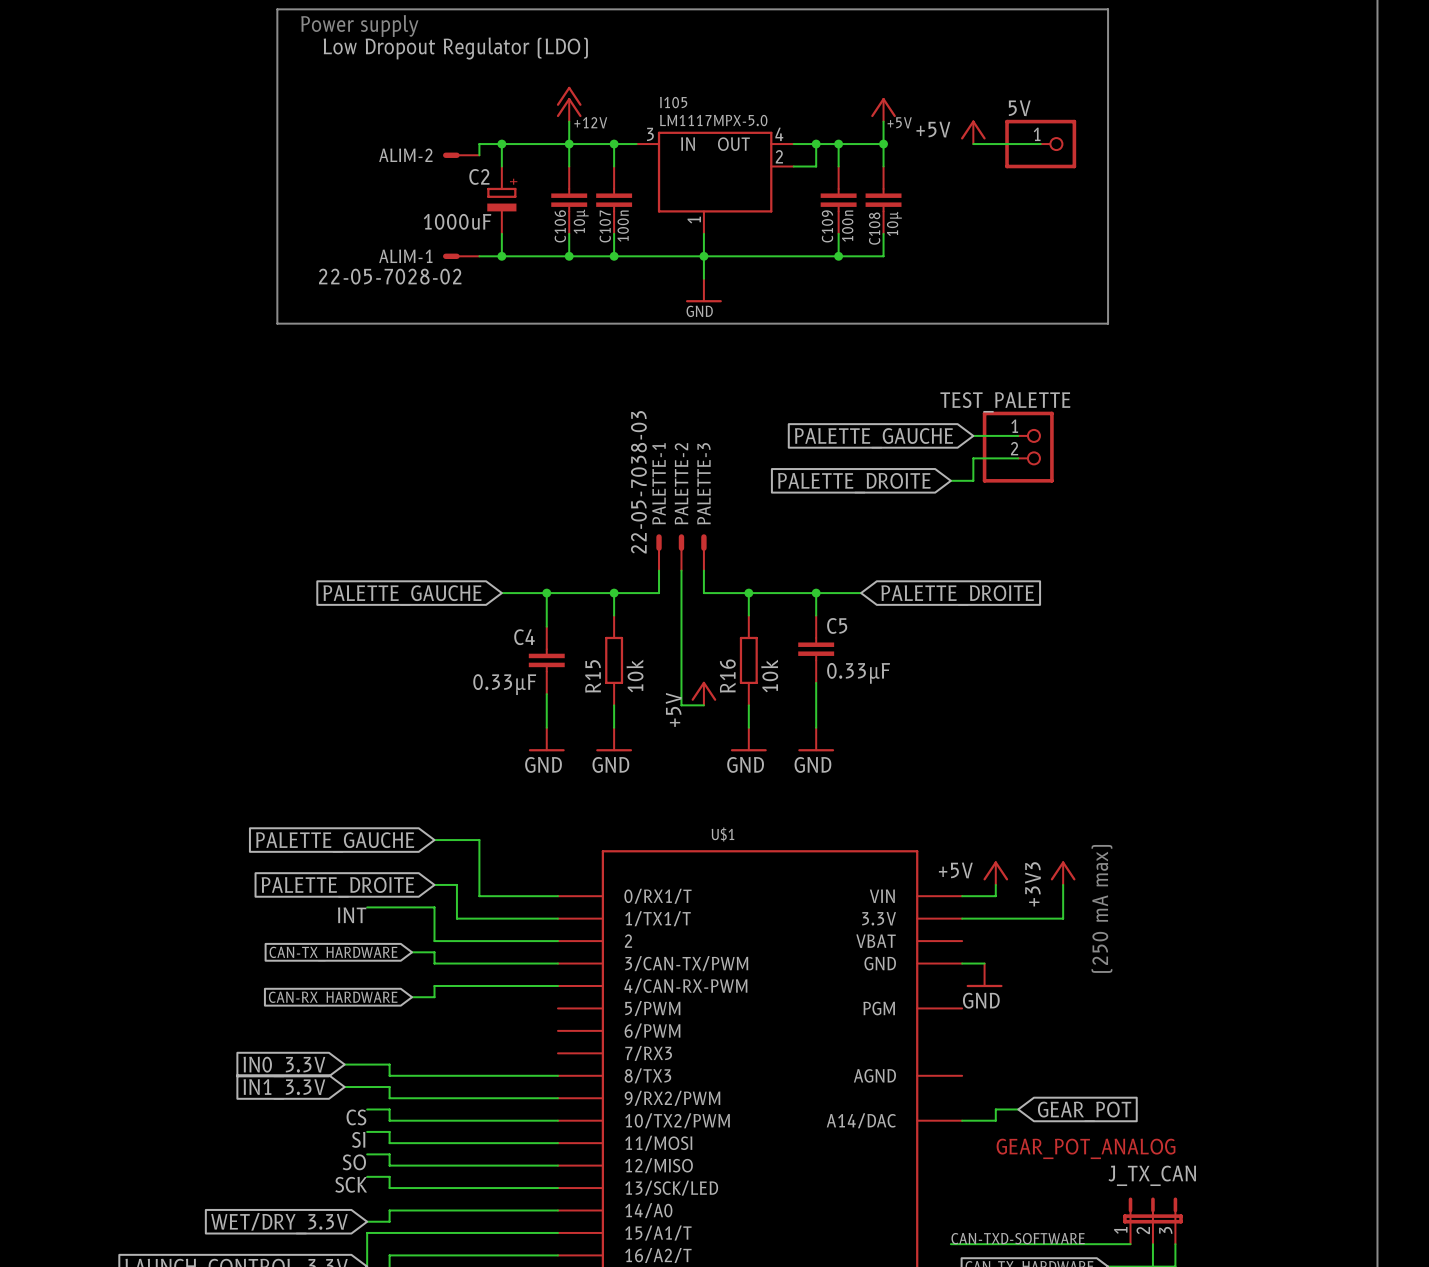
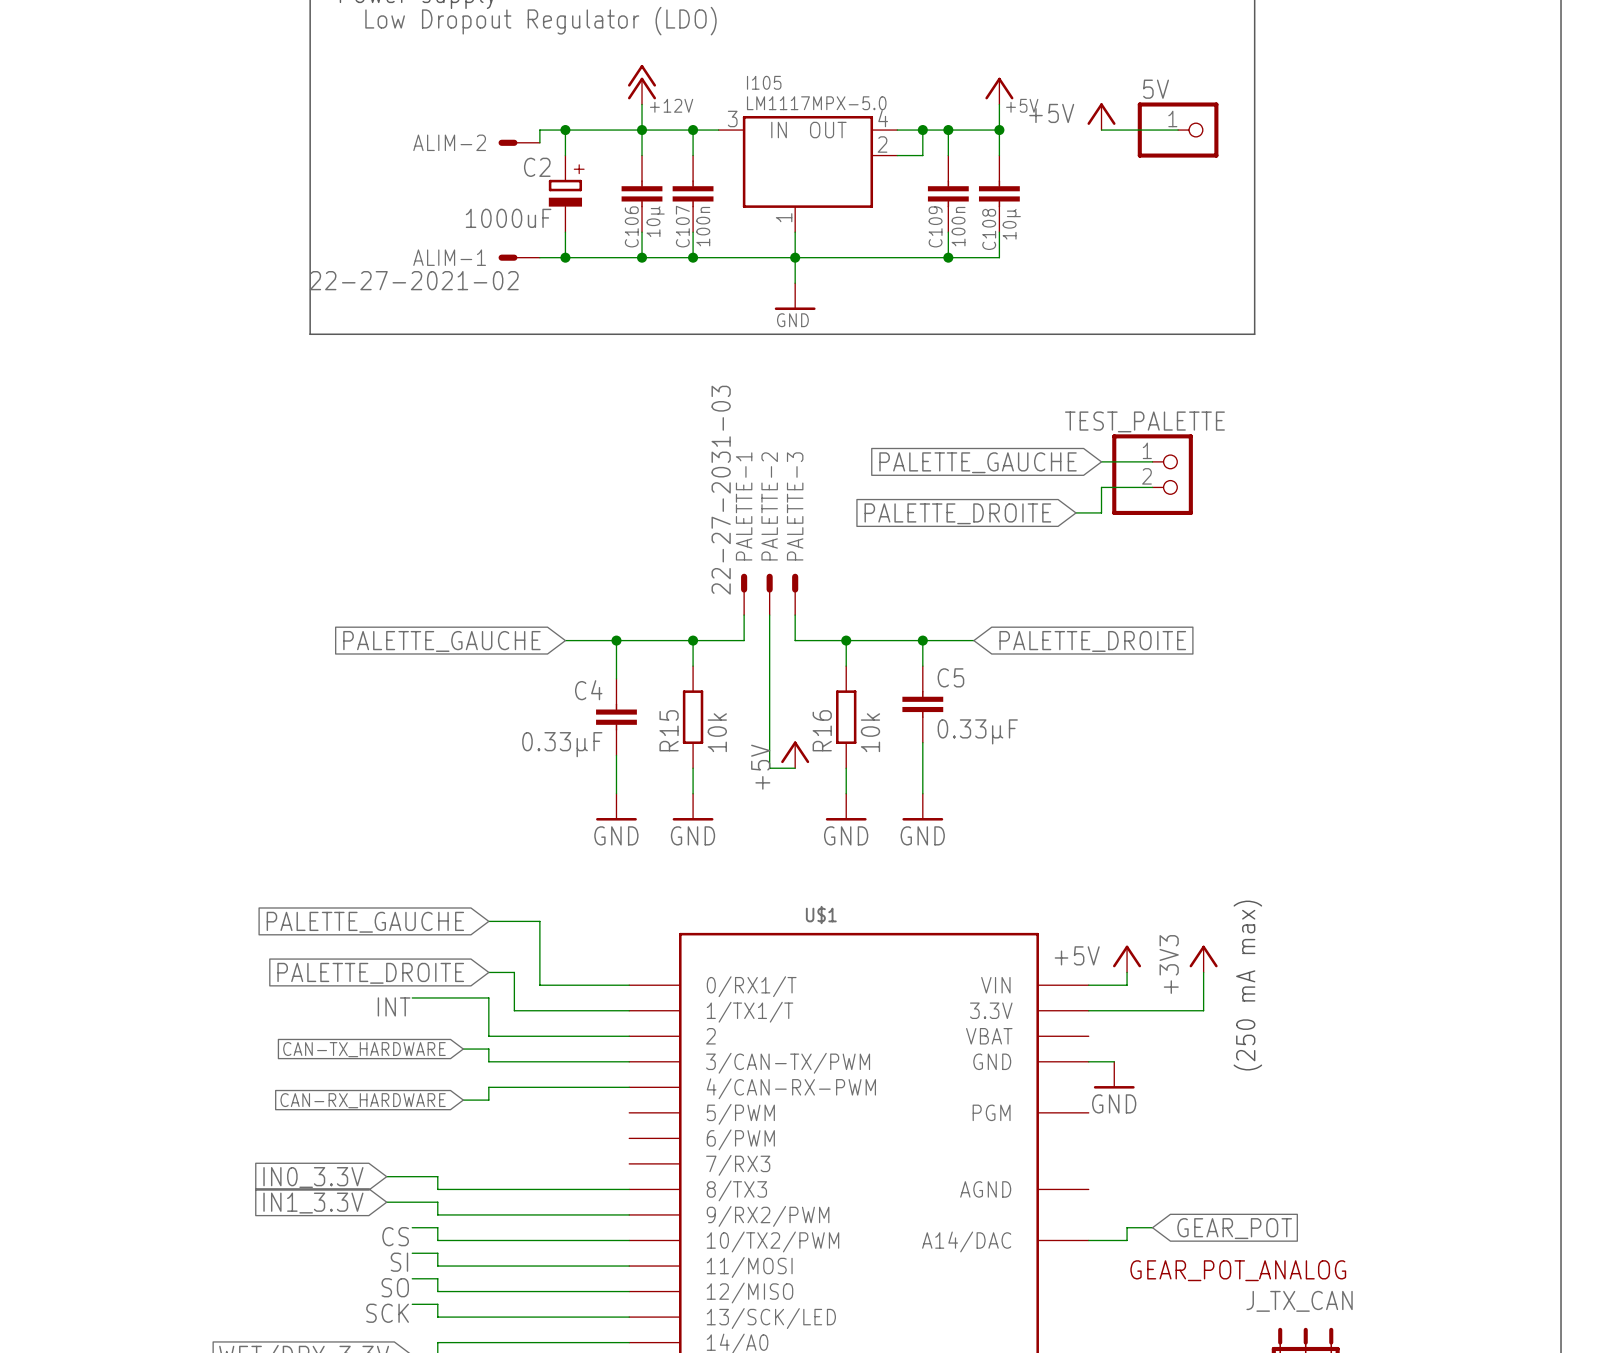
ALIM-1 value: 22-05-7028-02 (390, 276) -> 22-27-2021-02 (414, 280)
PALETTE-1 value: 22-05-7038-03 (638, 482) -> 22-27-2031-03 (721, 490)

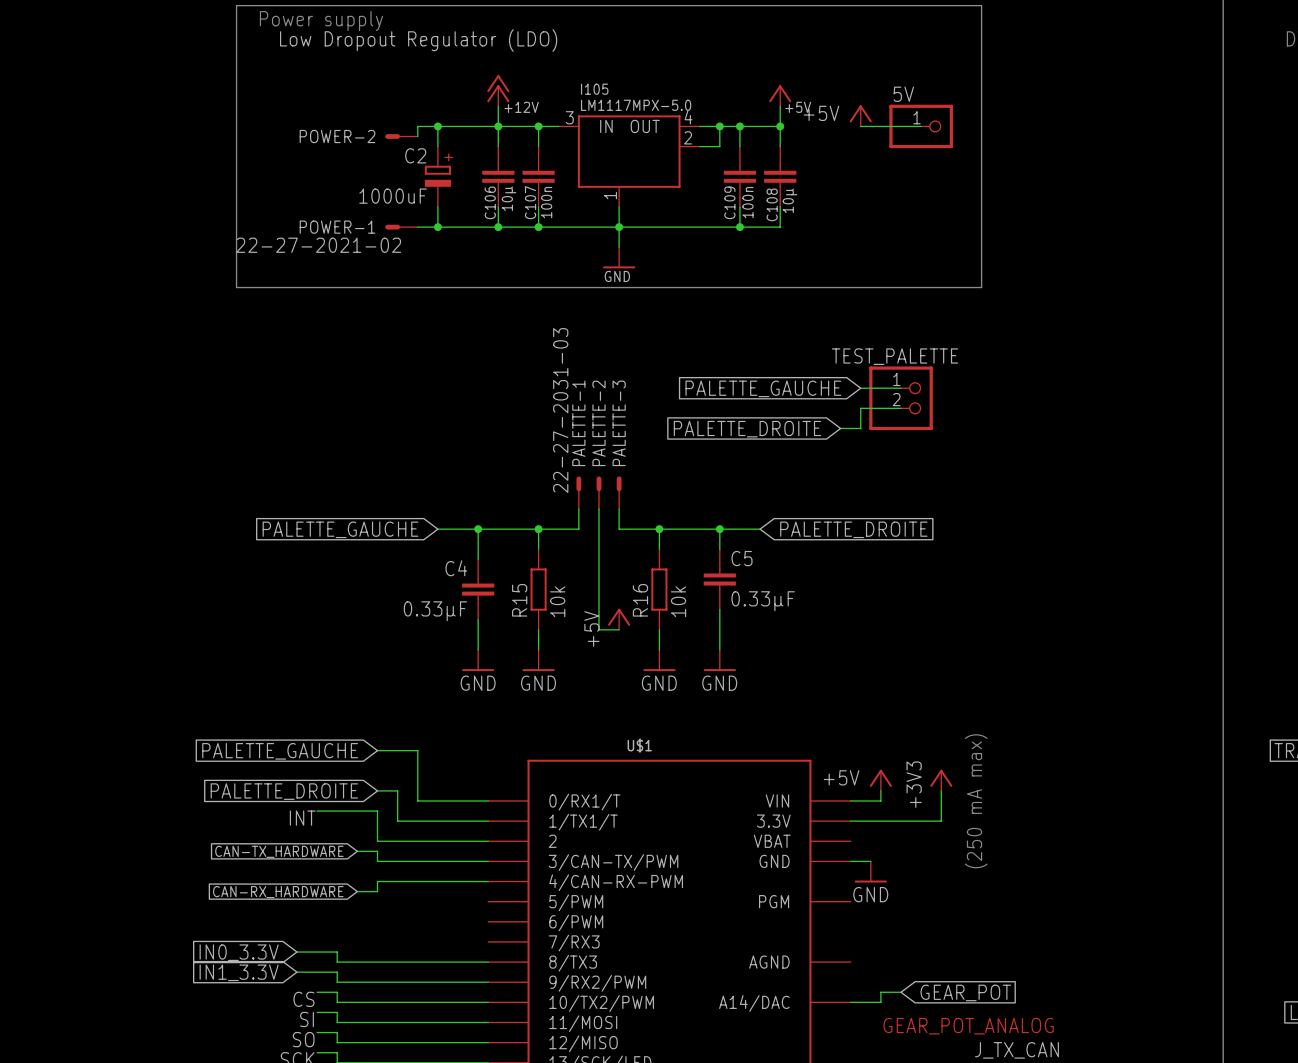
ALIM-2 name: ALIM-2 (449, 142) -> POWER-2 (337, 136)
ALIM-1 name: ALIM-1 (449, 257) -> POWER-1 (337, 227)

